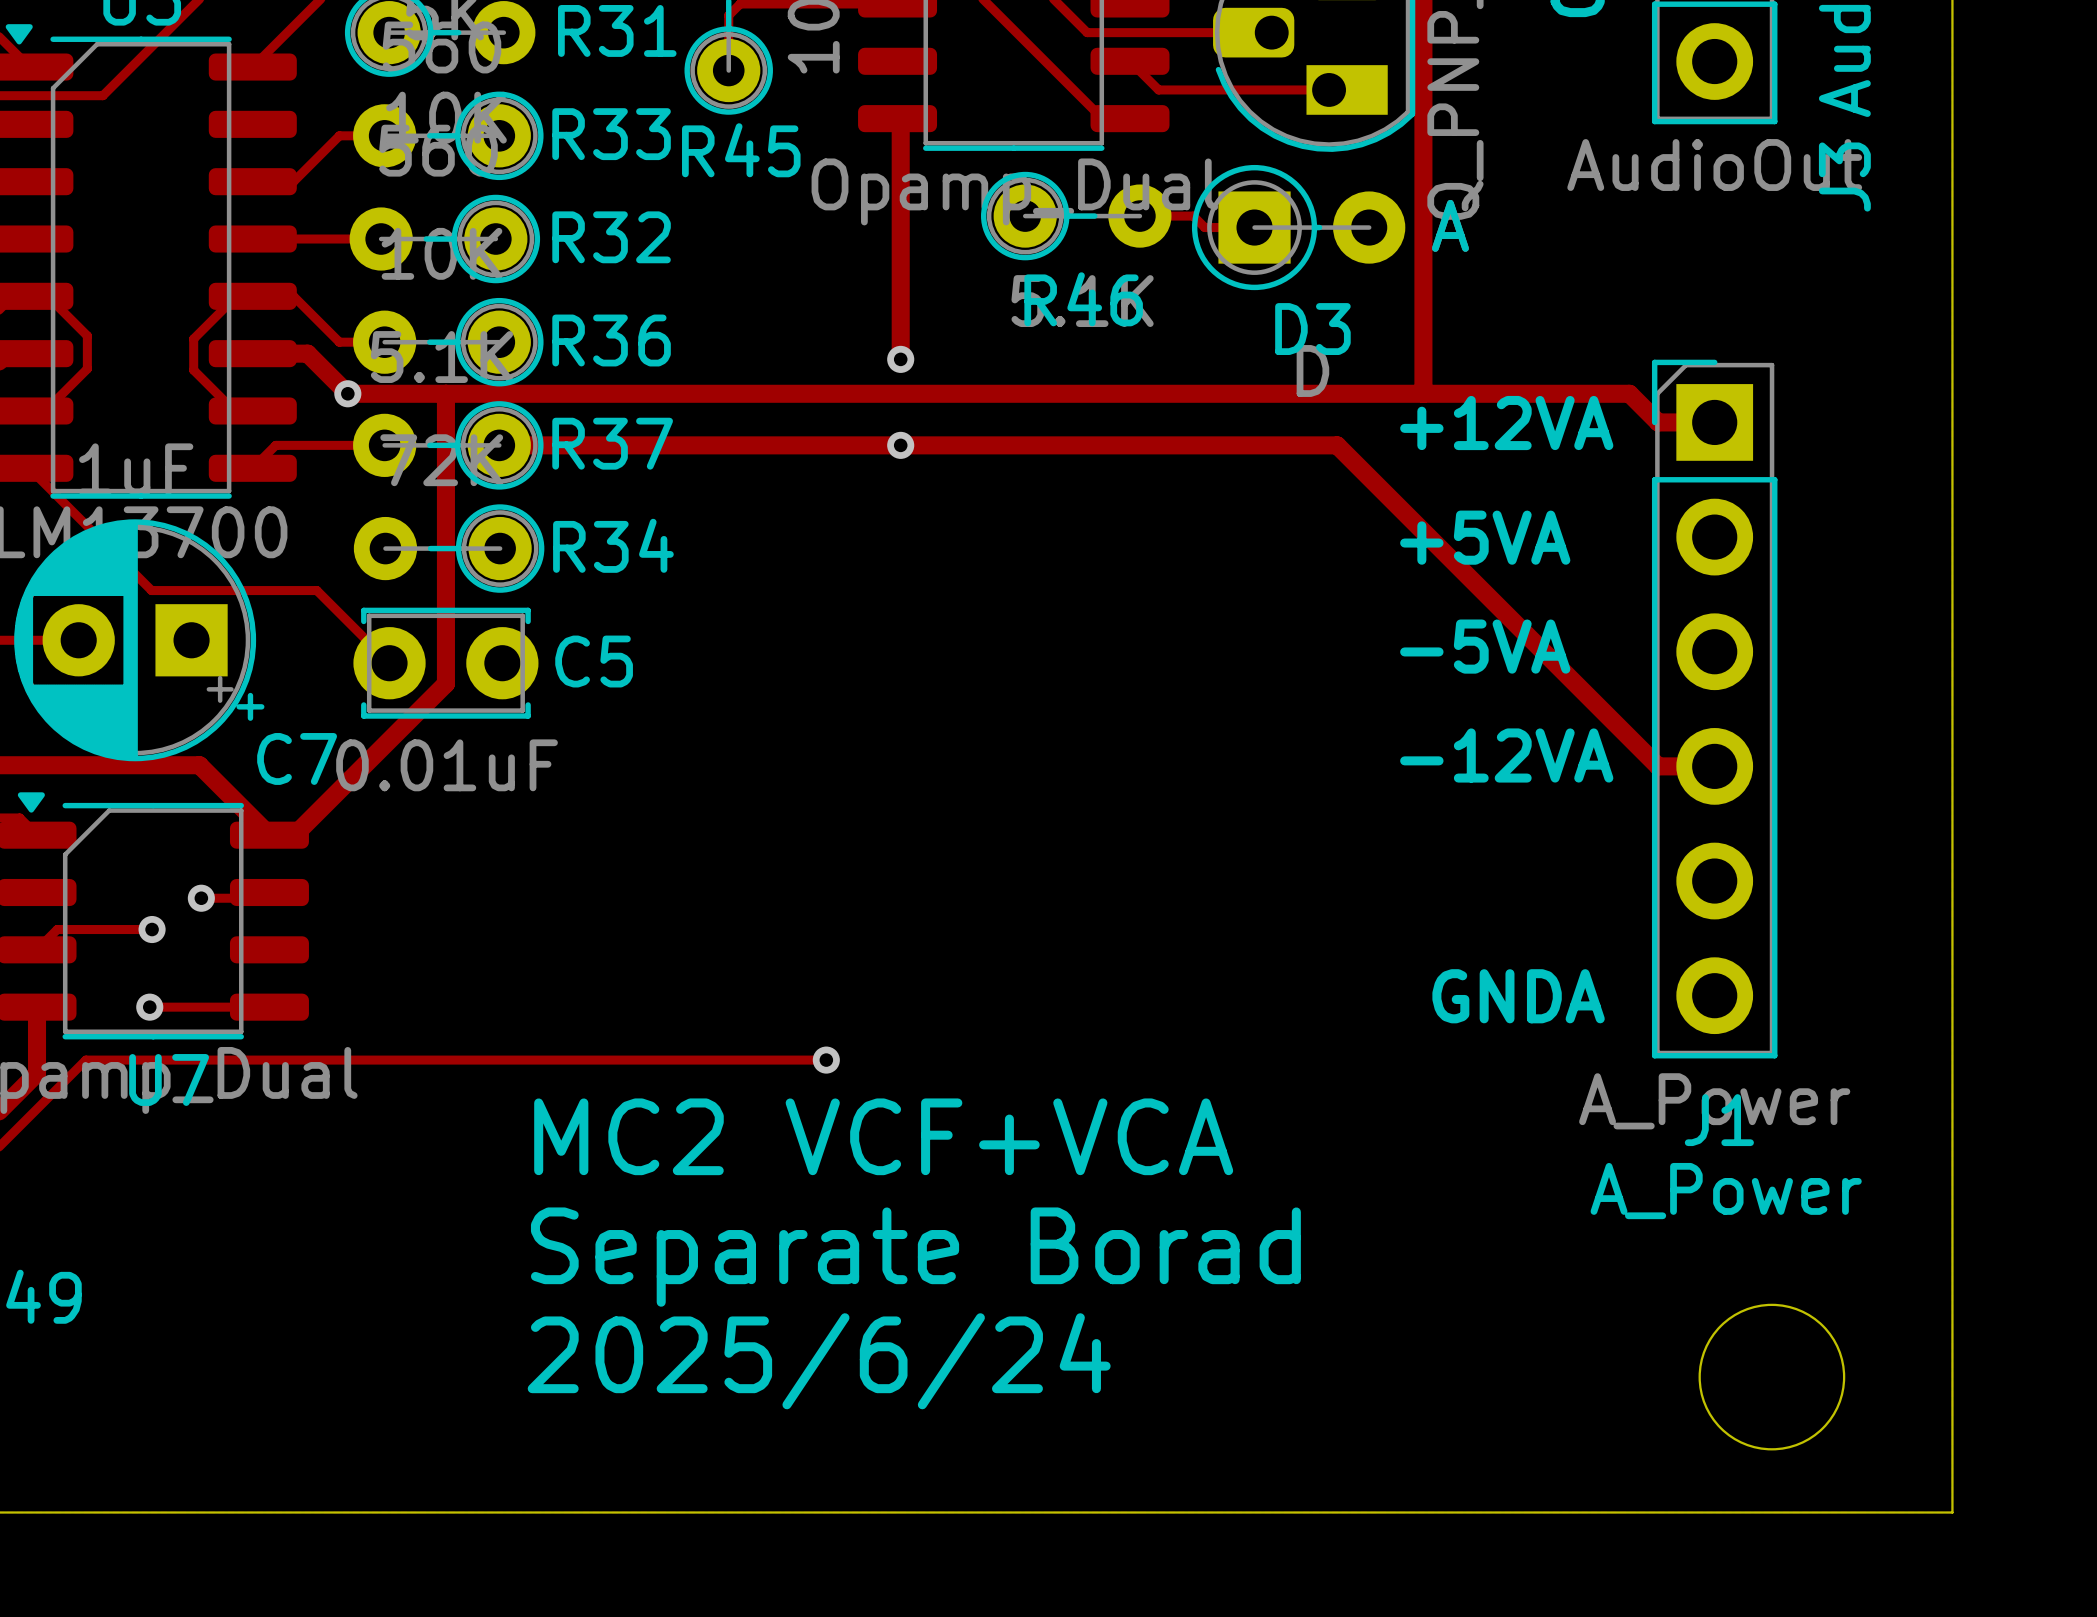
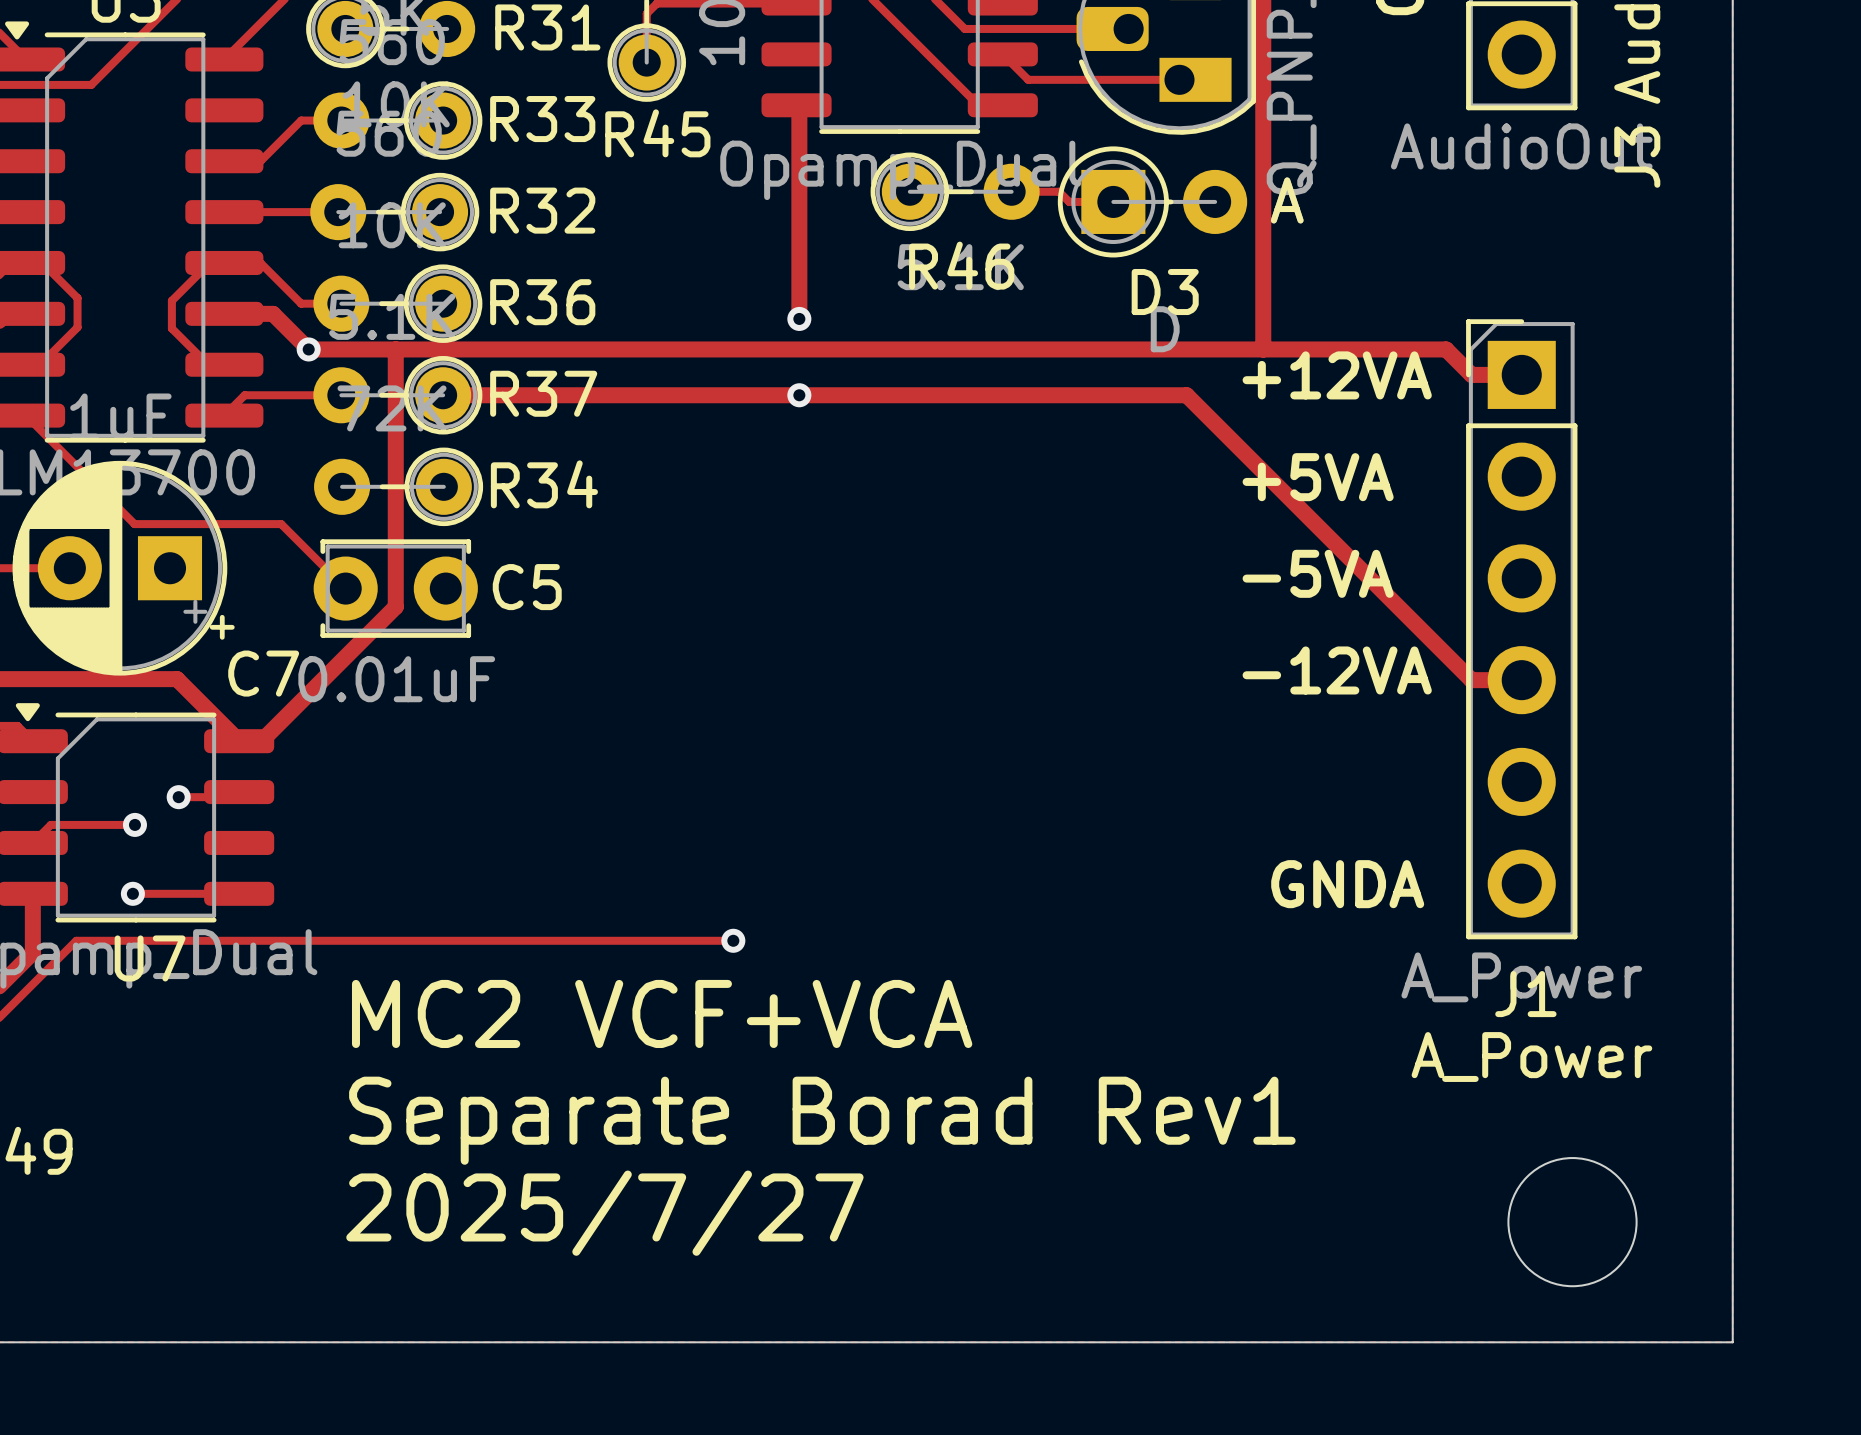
text position: MC2 VCF+VCA (883, 1136) -> MC2 VCF+VCA (662, 1013)
text: Separate Borad (915, 1257) -> Separate Borad Rev1 (822, 1120)
text: 2025/6/24 (819, 1361) -> 2025/7/27 (604, 1213)

